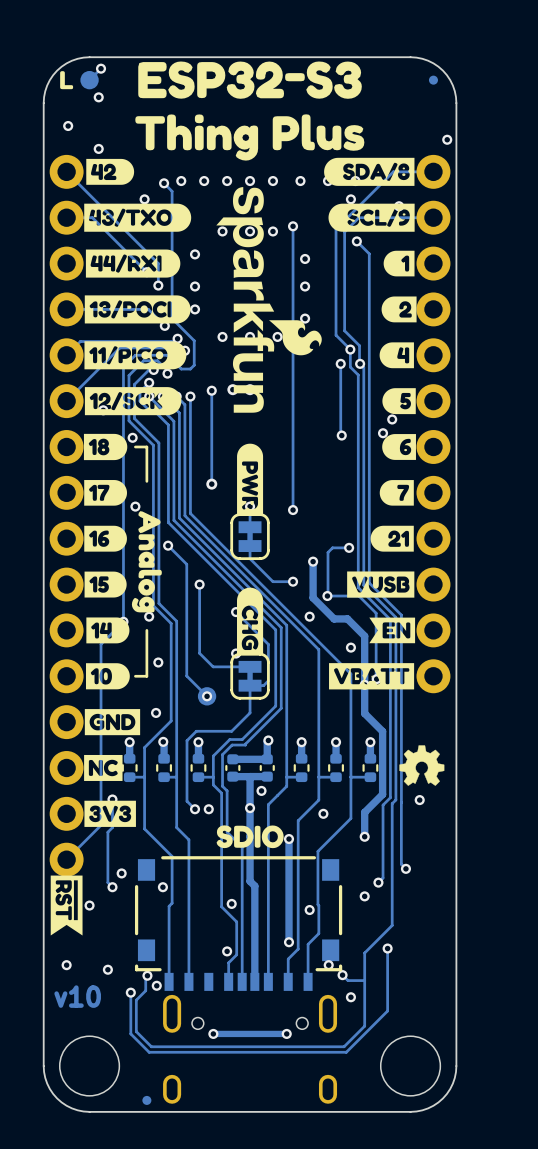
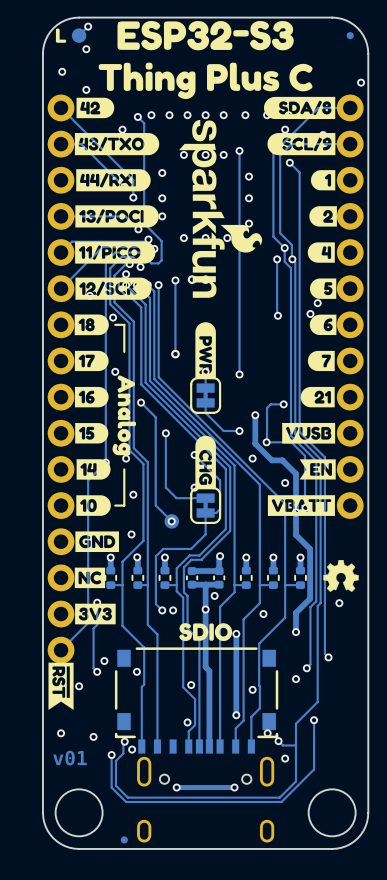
drawing shape: [135, 114, 365, 161] -> [98, 62, 313, 100]
text: v10 (77, 996) -> v01 (69, 758)

